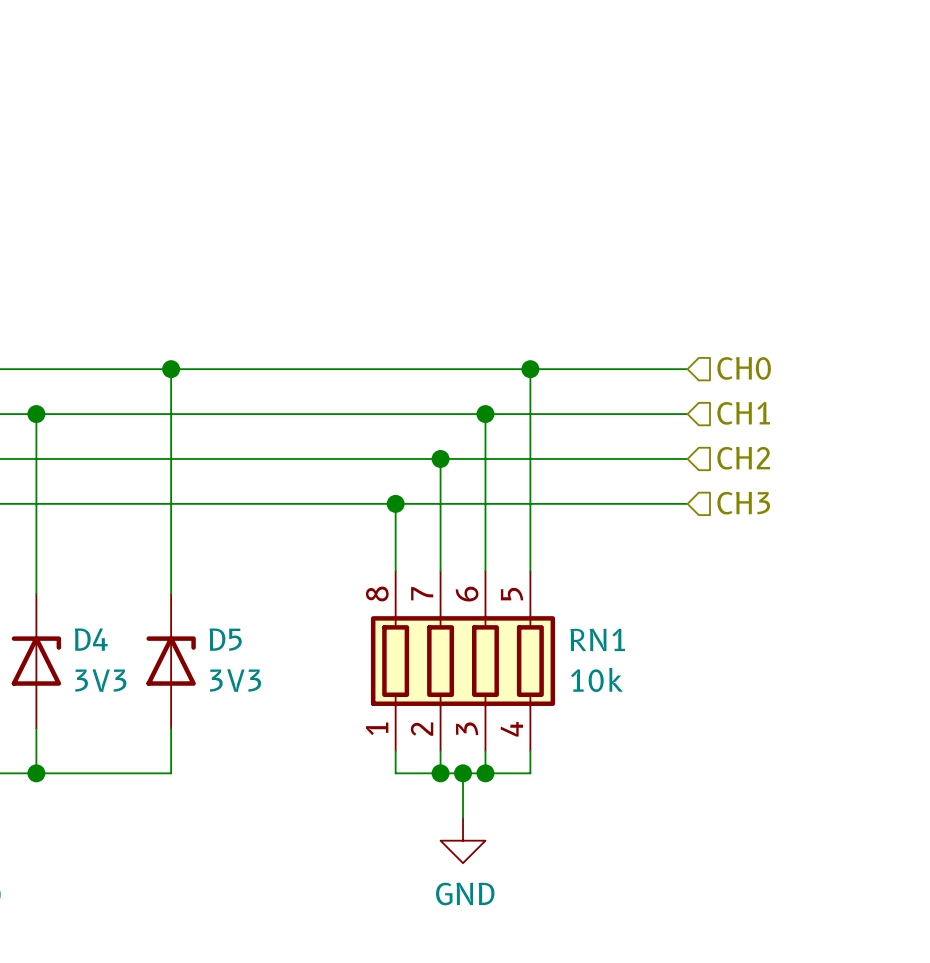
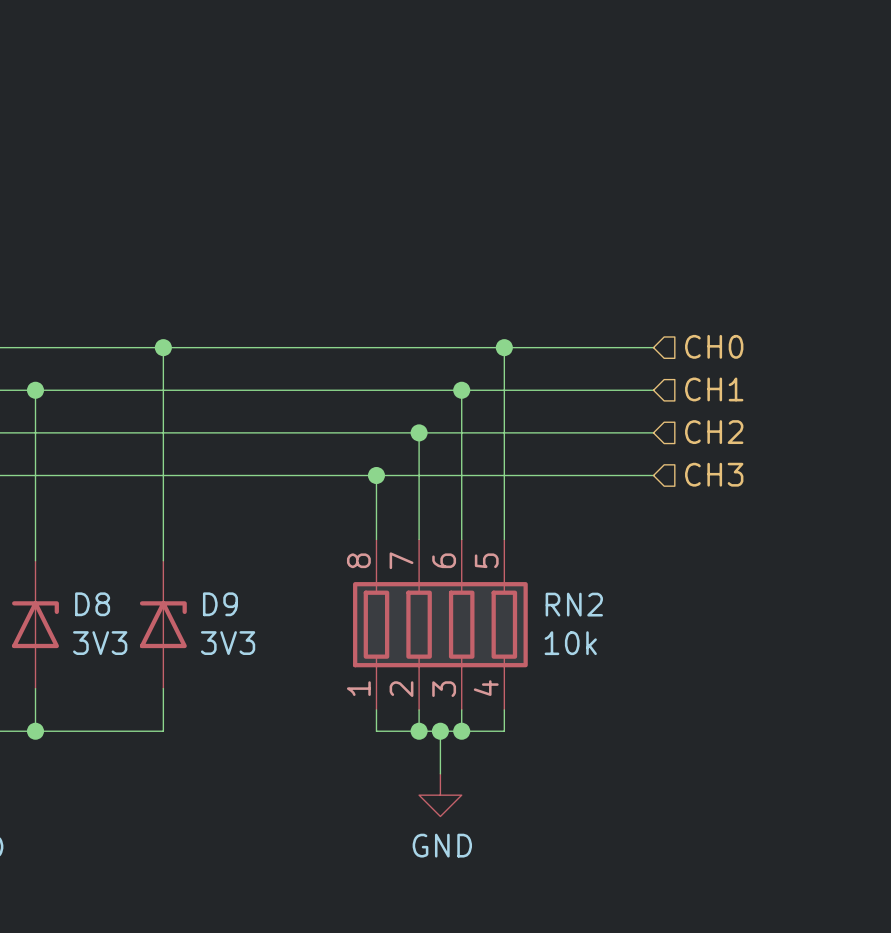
D4 name: D4 (91, 639) -> D8 (92, 604)
D5 name: D5 (225, 639) -> D9 (220, 604)
RN1 name: RN1 (597, 639) -> RN2 (574, 604)

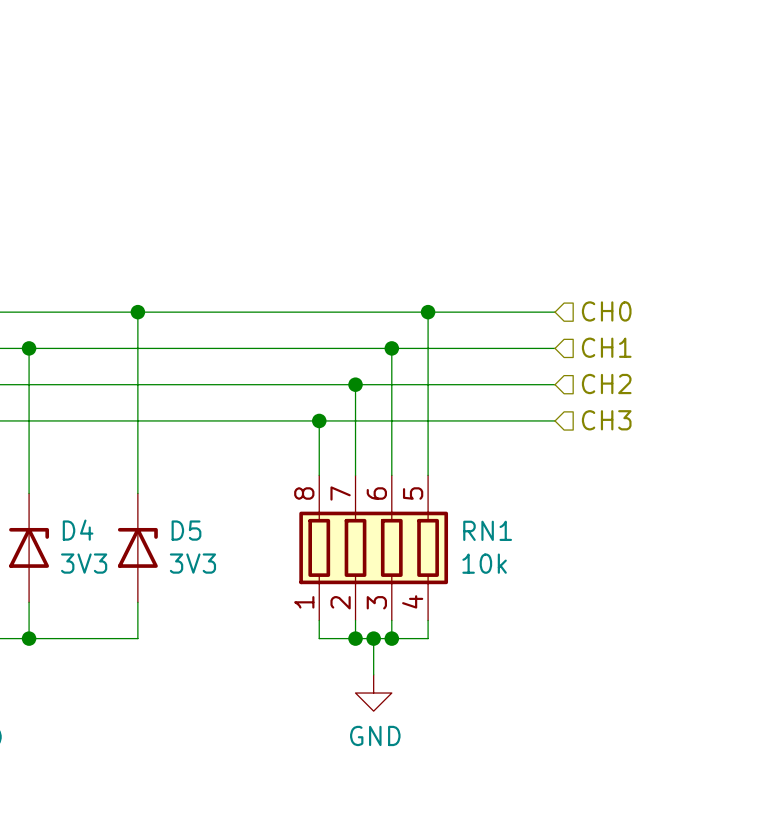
D8 name: D8 (92, 604) -> D4 (78, 530)
D9 name: D9 (220, 604) -> D5 (186, 530)
RN2 name: RN2 (574, 604) -> RN1 (487, 530)

